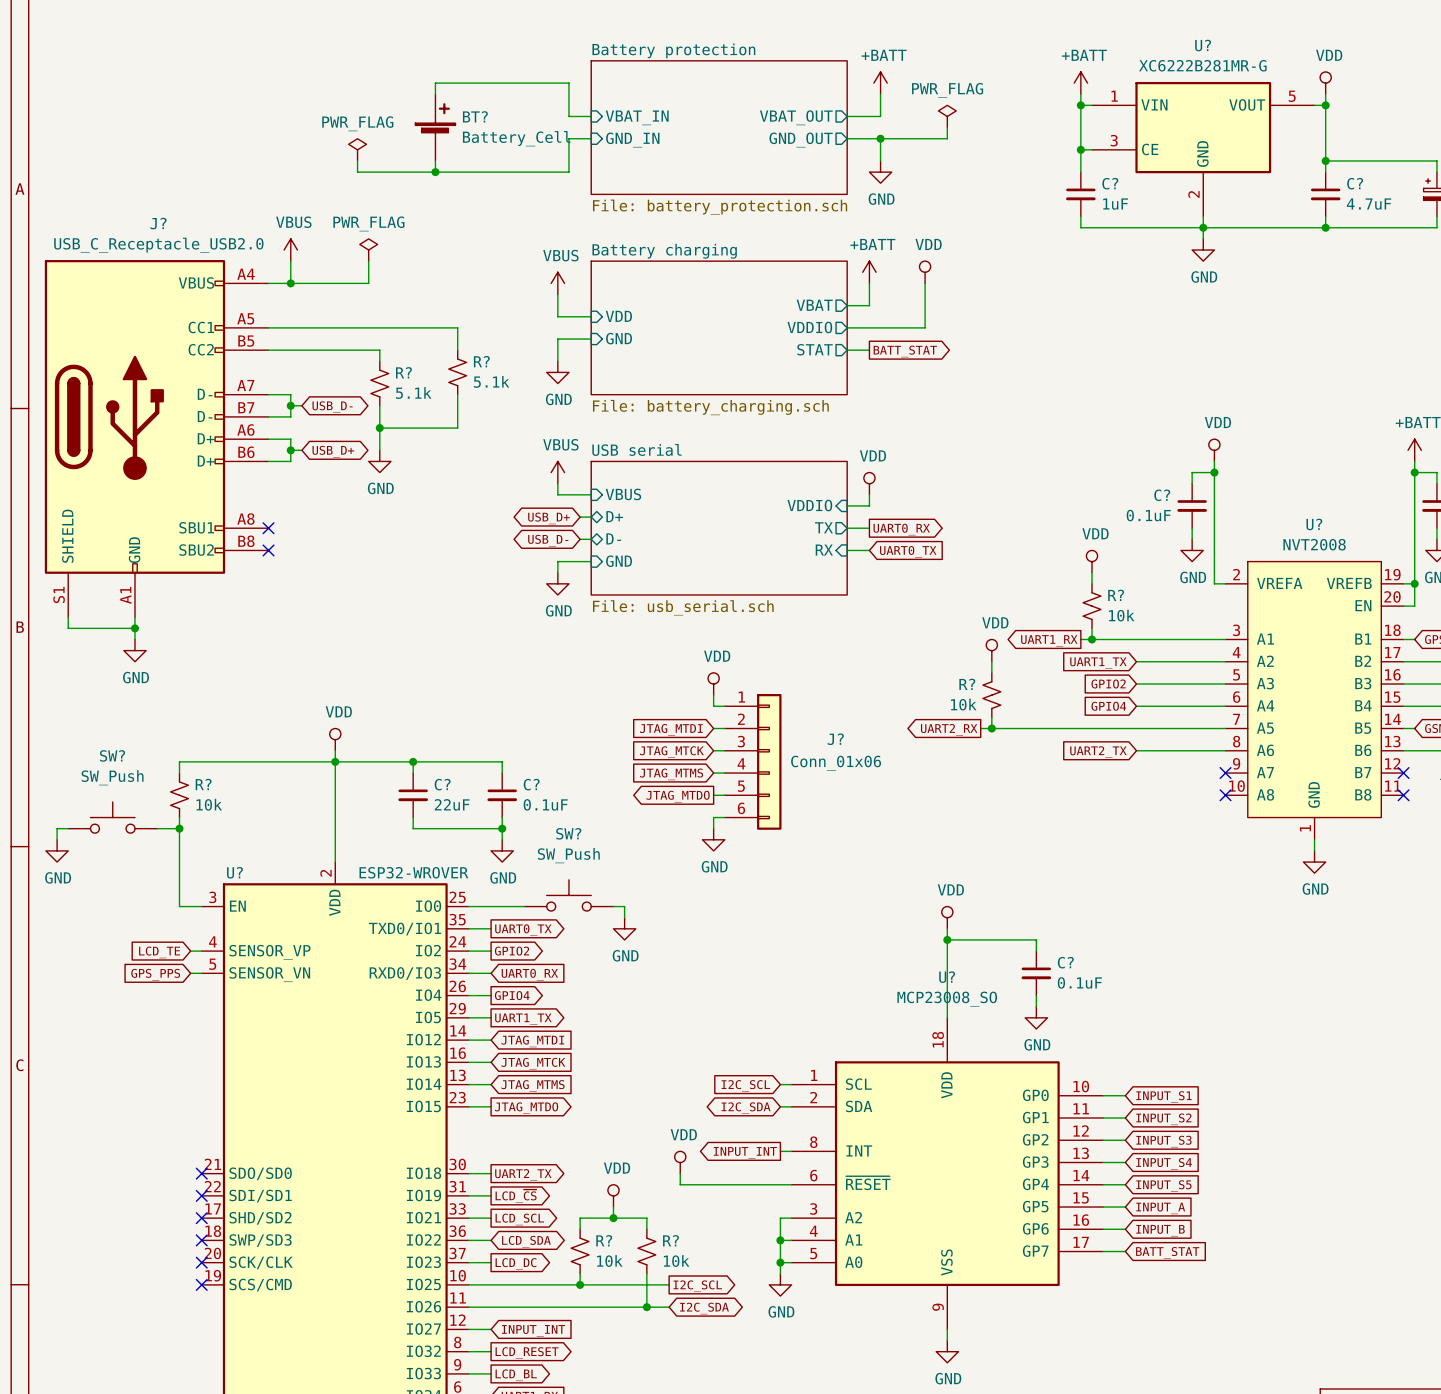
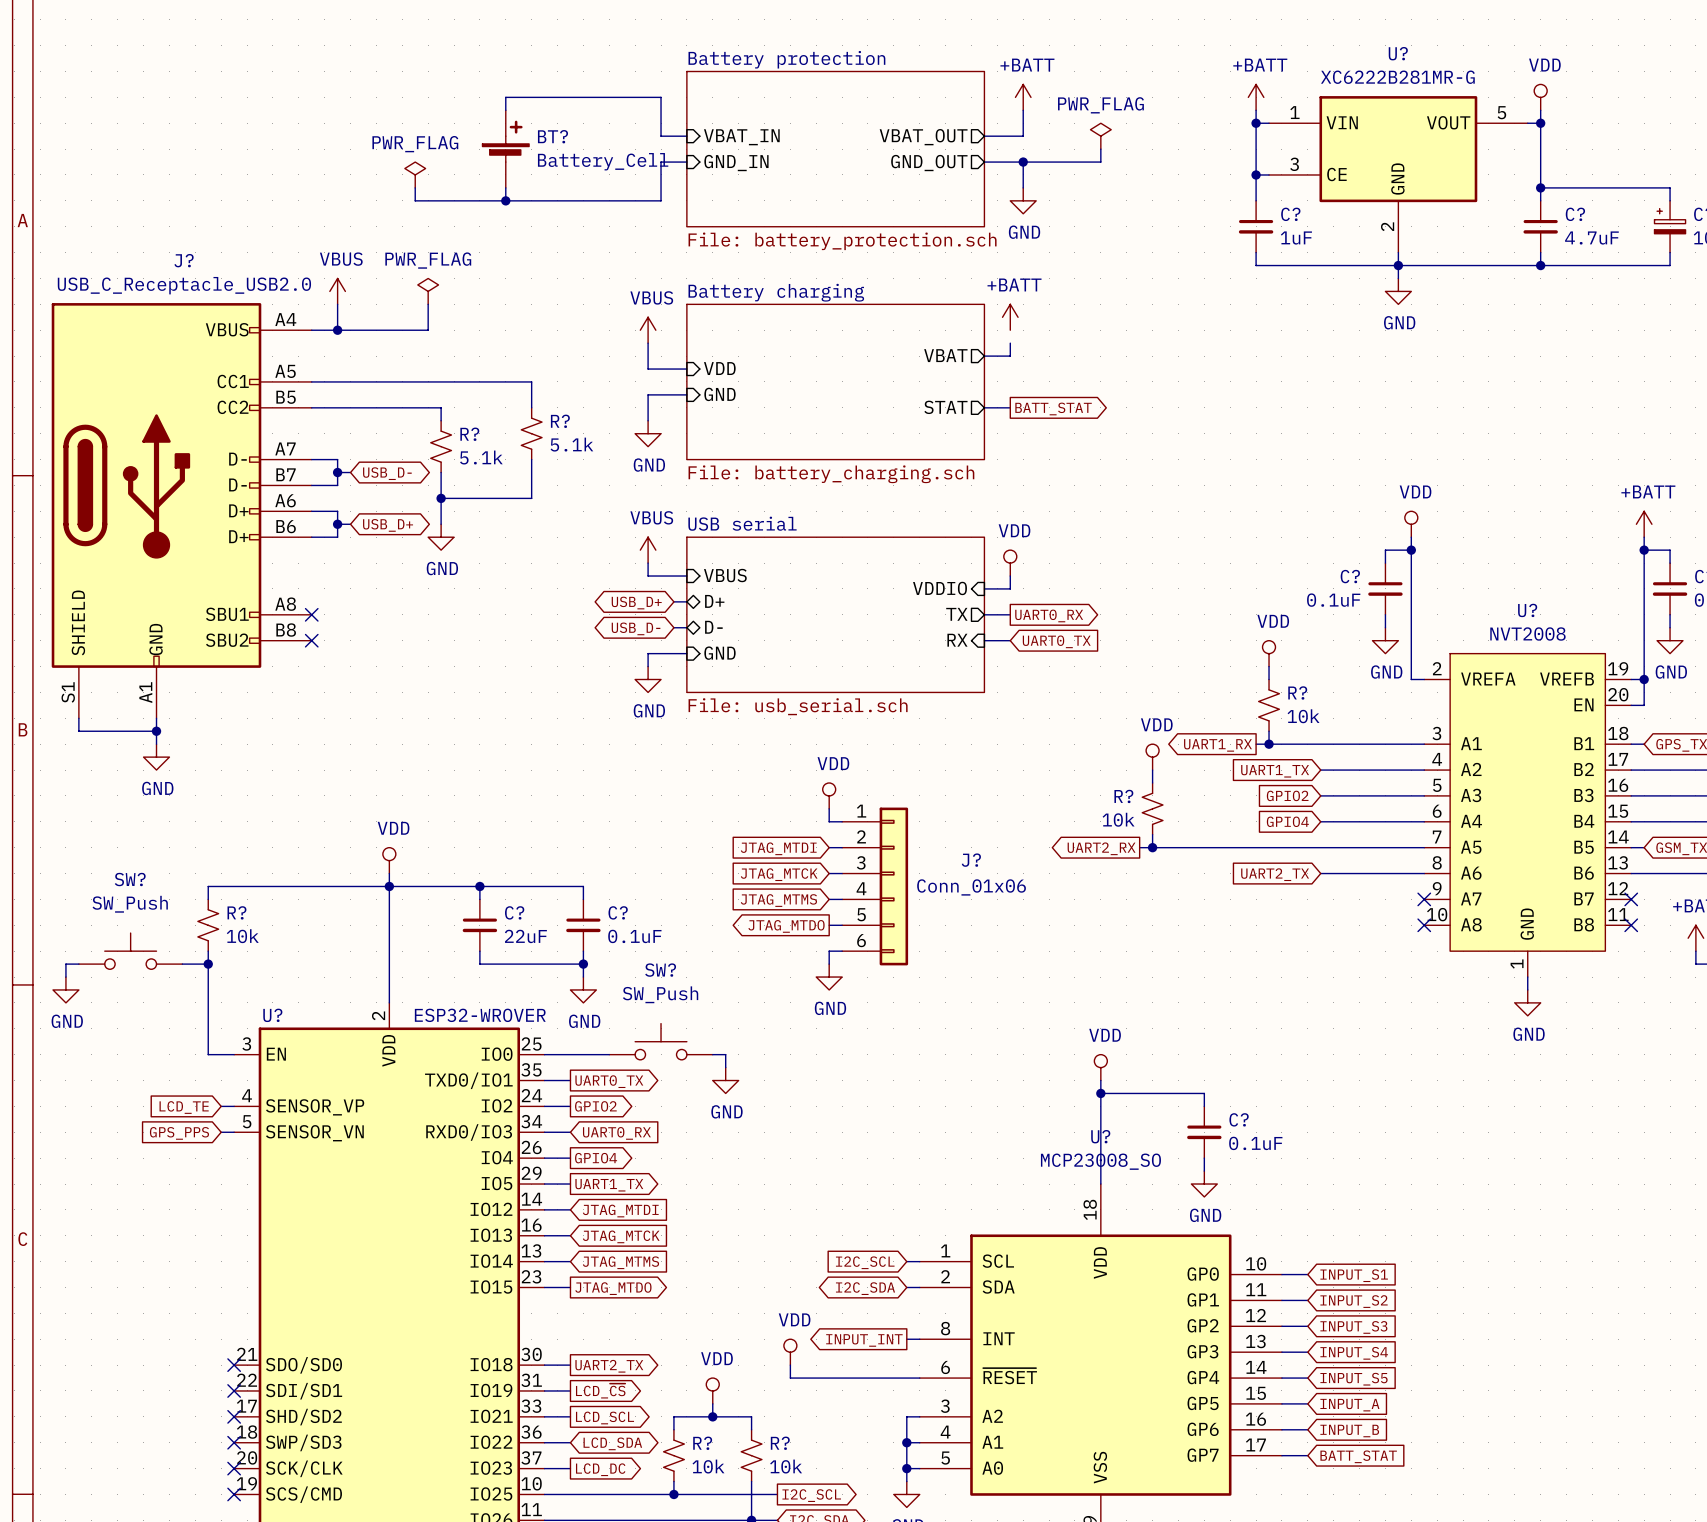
power symbol: VDD (925, 272) -> none
wire: (869, 283) (869, 294) -> none
wire: (925, 283) (925, 327) (847, 327) -> none
sheet pin: VDDIO (809, 327) -> none

